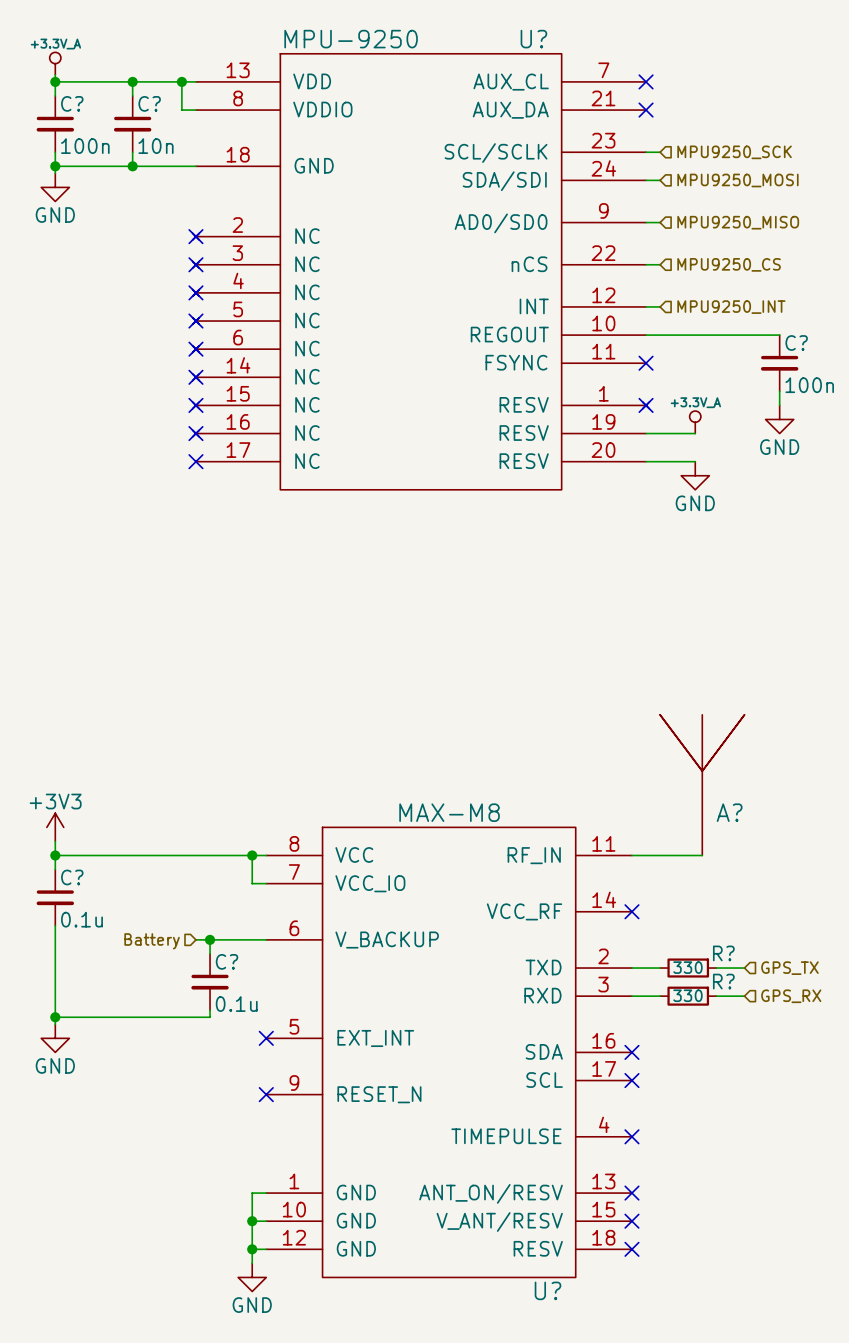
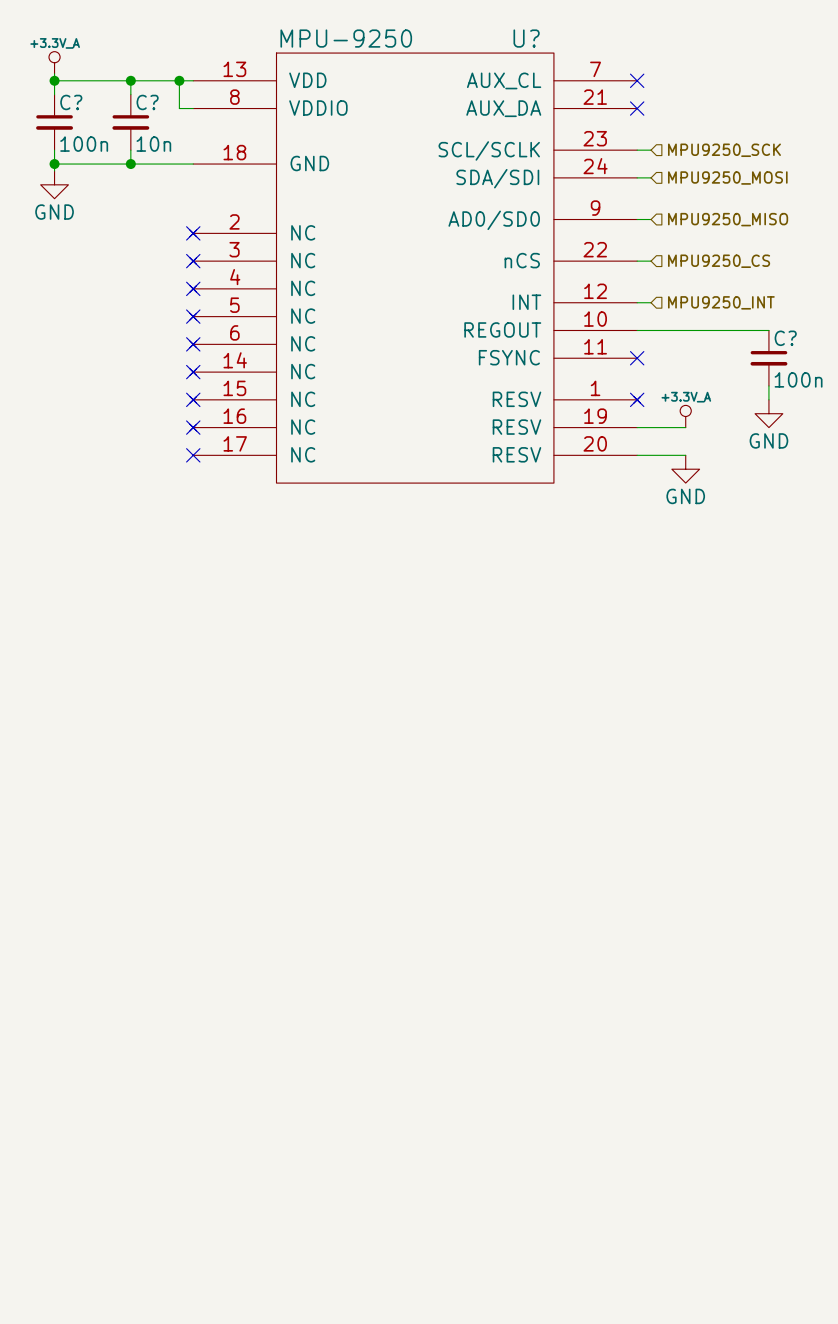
A?: (702, 785) -> none
power symbol: +3V3 (55, 827) -> none
wire: (55, 841) (55, 869) -> none
wire: (55, 855) (266, 855) -> none
junction: (55, 855) -> none
wire: (252, 855) (252, 883) (266, 883) -> none
junction: (252, 855) -> none
wire: (631, 855) (702, 855) -> none
C?: 0.1u (55, 897) -> none
no-connect mark: (631, 911) -> none
wire: (55, 925) (55, 1024) -> none
wire: (195, 939) (266, 939) -> none
wire: (210, 939) (210, 953) -> none
junction: (210, 939) -> none
hierarchical label: Battery (152, 941) -> none
wire: (631, 968) (660, 968) -> none
R?: 330 (688, 968) -> none
wire: (716, 968) (744, 968) -> none
hierarchical label: GPS_TX (789, 968) -> none
C?: 0.1u (210, 982) -> none
wire: (631, 996) (660, 996) -> none
R?: 330 (688, 996) -> none
wire: (716, 996) (744, 996) -> none
hierarchical label: GPS_RX (791, 996) -> none
wire: (210, 1010) (210, 1017) (55, 1017) -> none
junction: (55, 1017) -> none
power symbol: GND (55, 1038) -> none
no-connect mark: (266, 1038) -> none
U?: MAX-M8 (449, 1052) -> none
no-connect mark: (631, 1052) -> none
no-connect mark: (631, 1080) -> none
no-connect mark: (266, 1094) -> none
no-connect mark: (631, 1136) -> none
wire: (266, 1193) (252, 1193) (252, 1263) -> none
no-connect mark: (631, 1193) -> none
wire: (252, 1221) (266, 1221) -> none
junction: (252, 1221) -> none
no-connect mark: (631, 1221) -> none
wire: (252, 1249) (266, 1249) -> none
junction: (252, 1249) -> none
no-connect mark: (631, 1249) -> none
power symbol: GND (252, 1277) -> none

